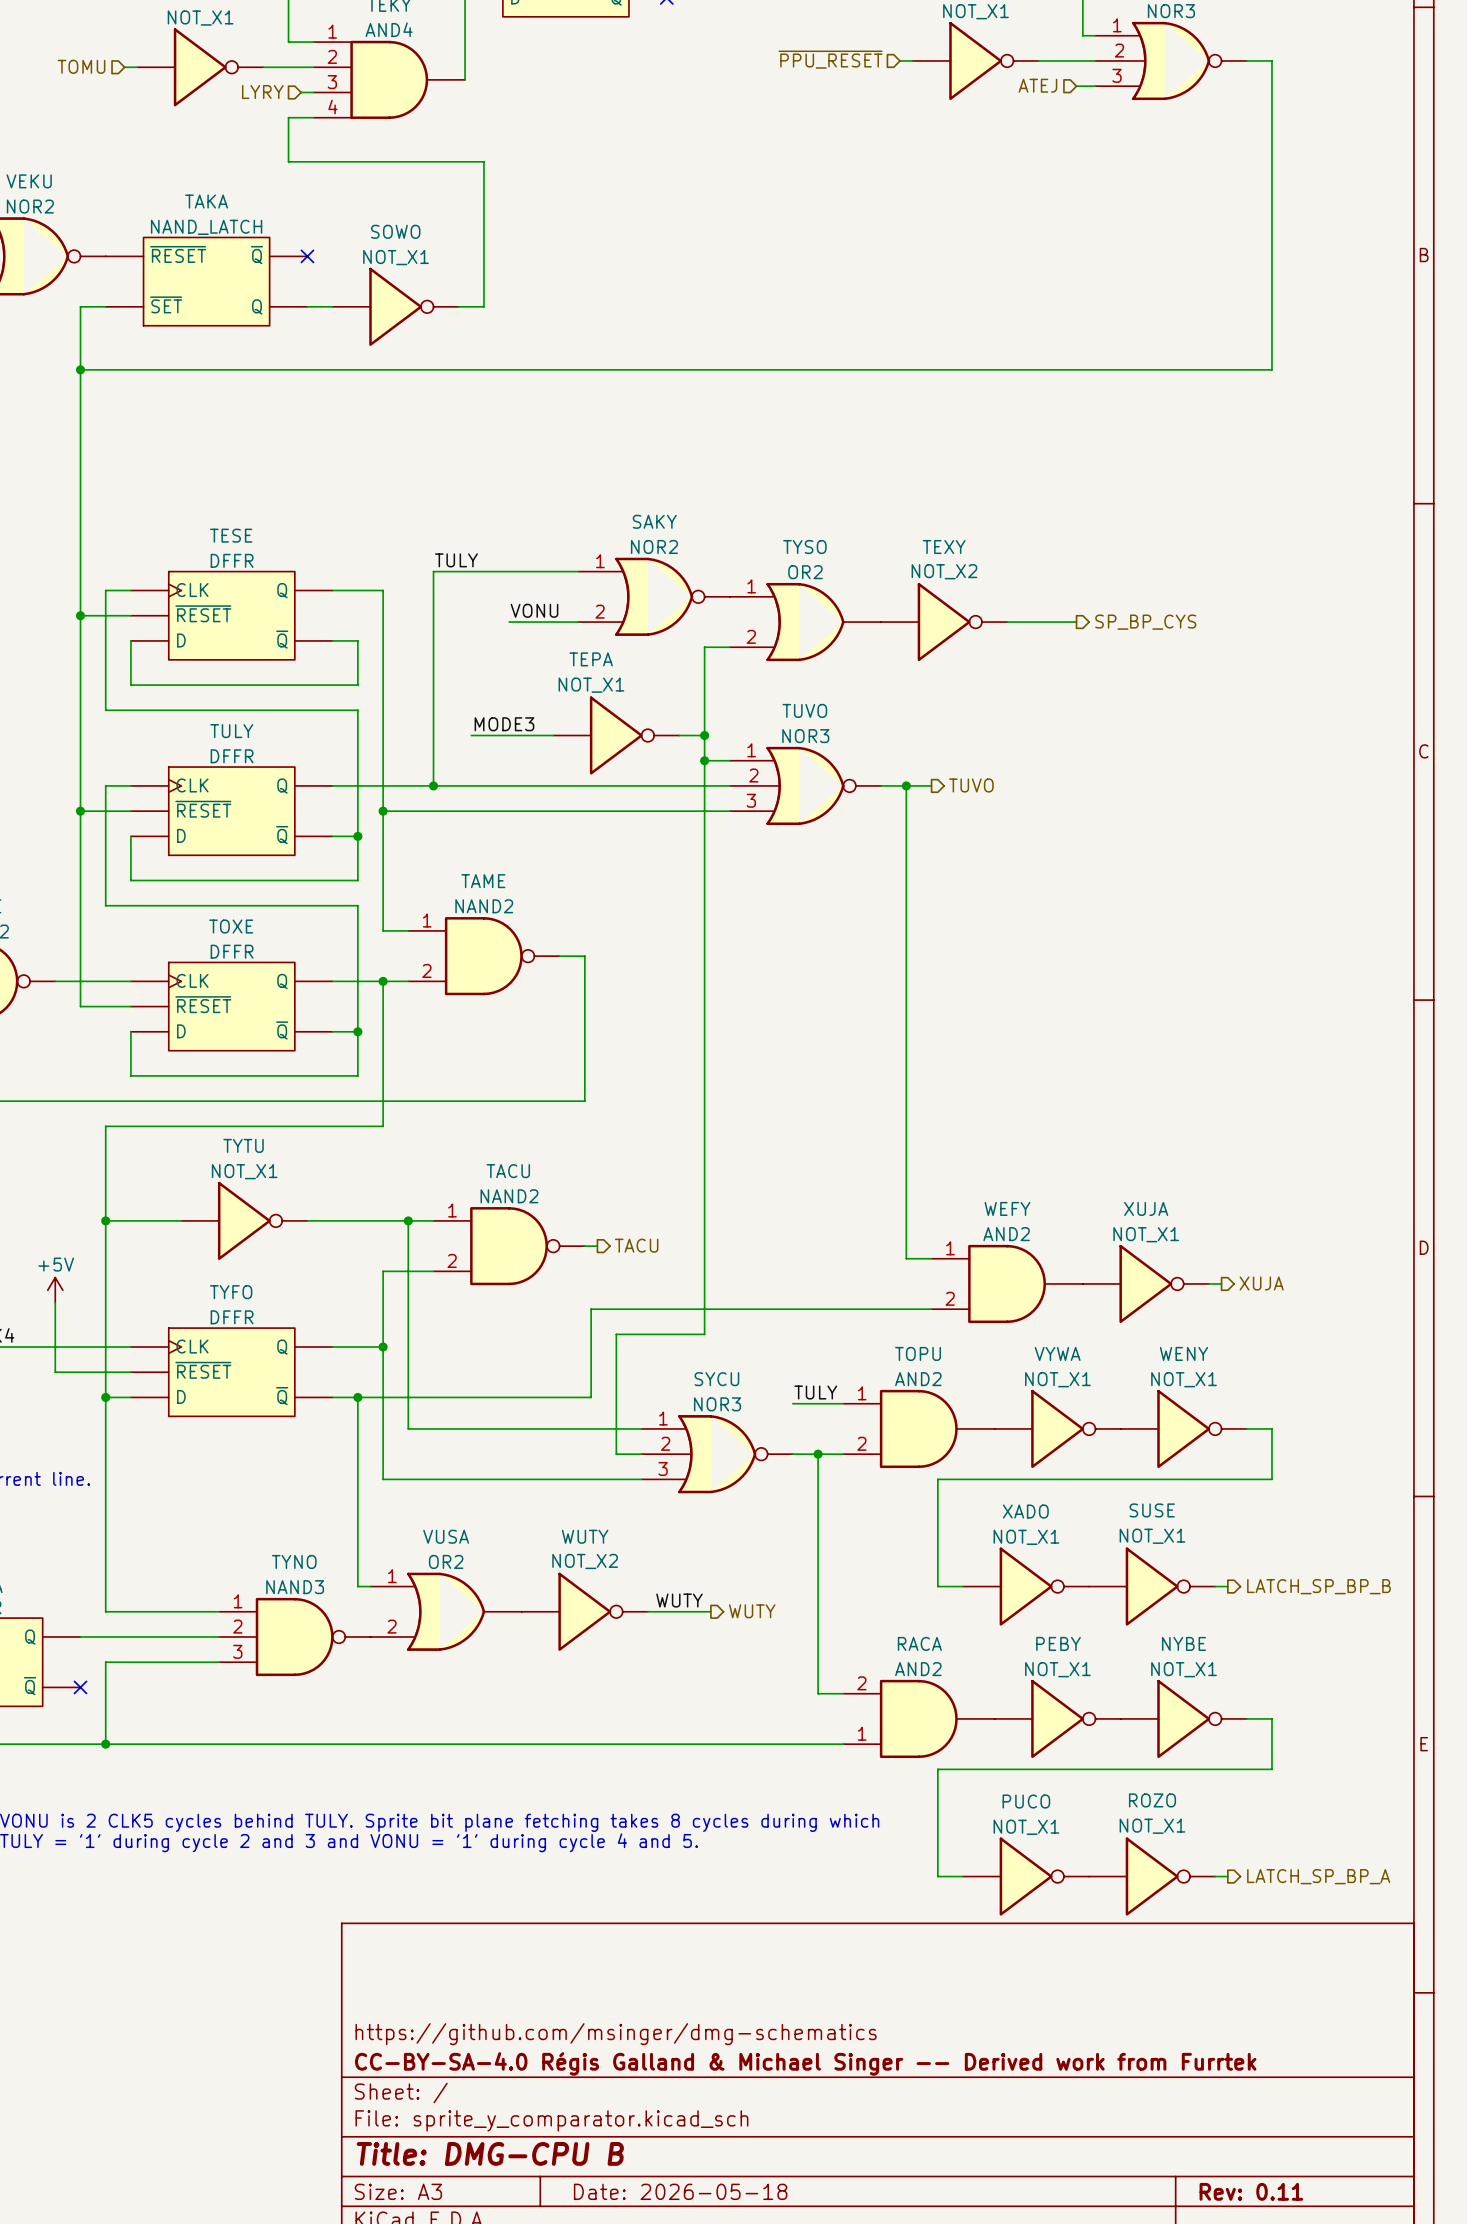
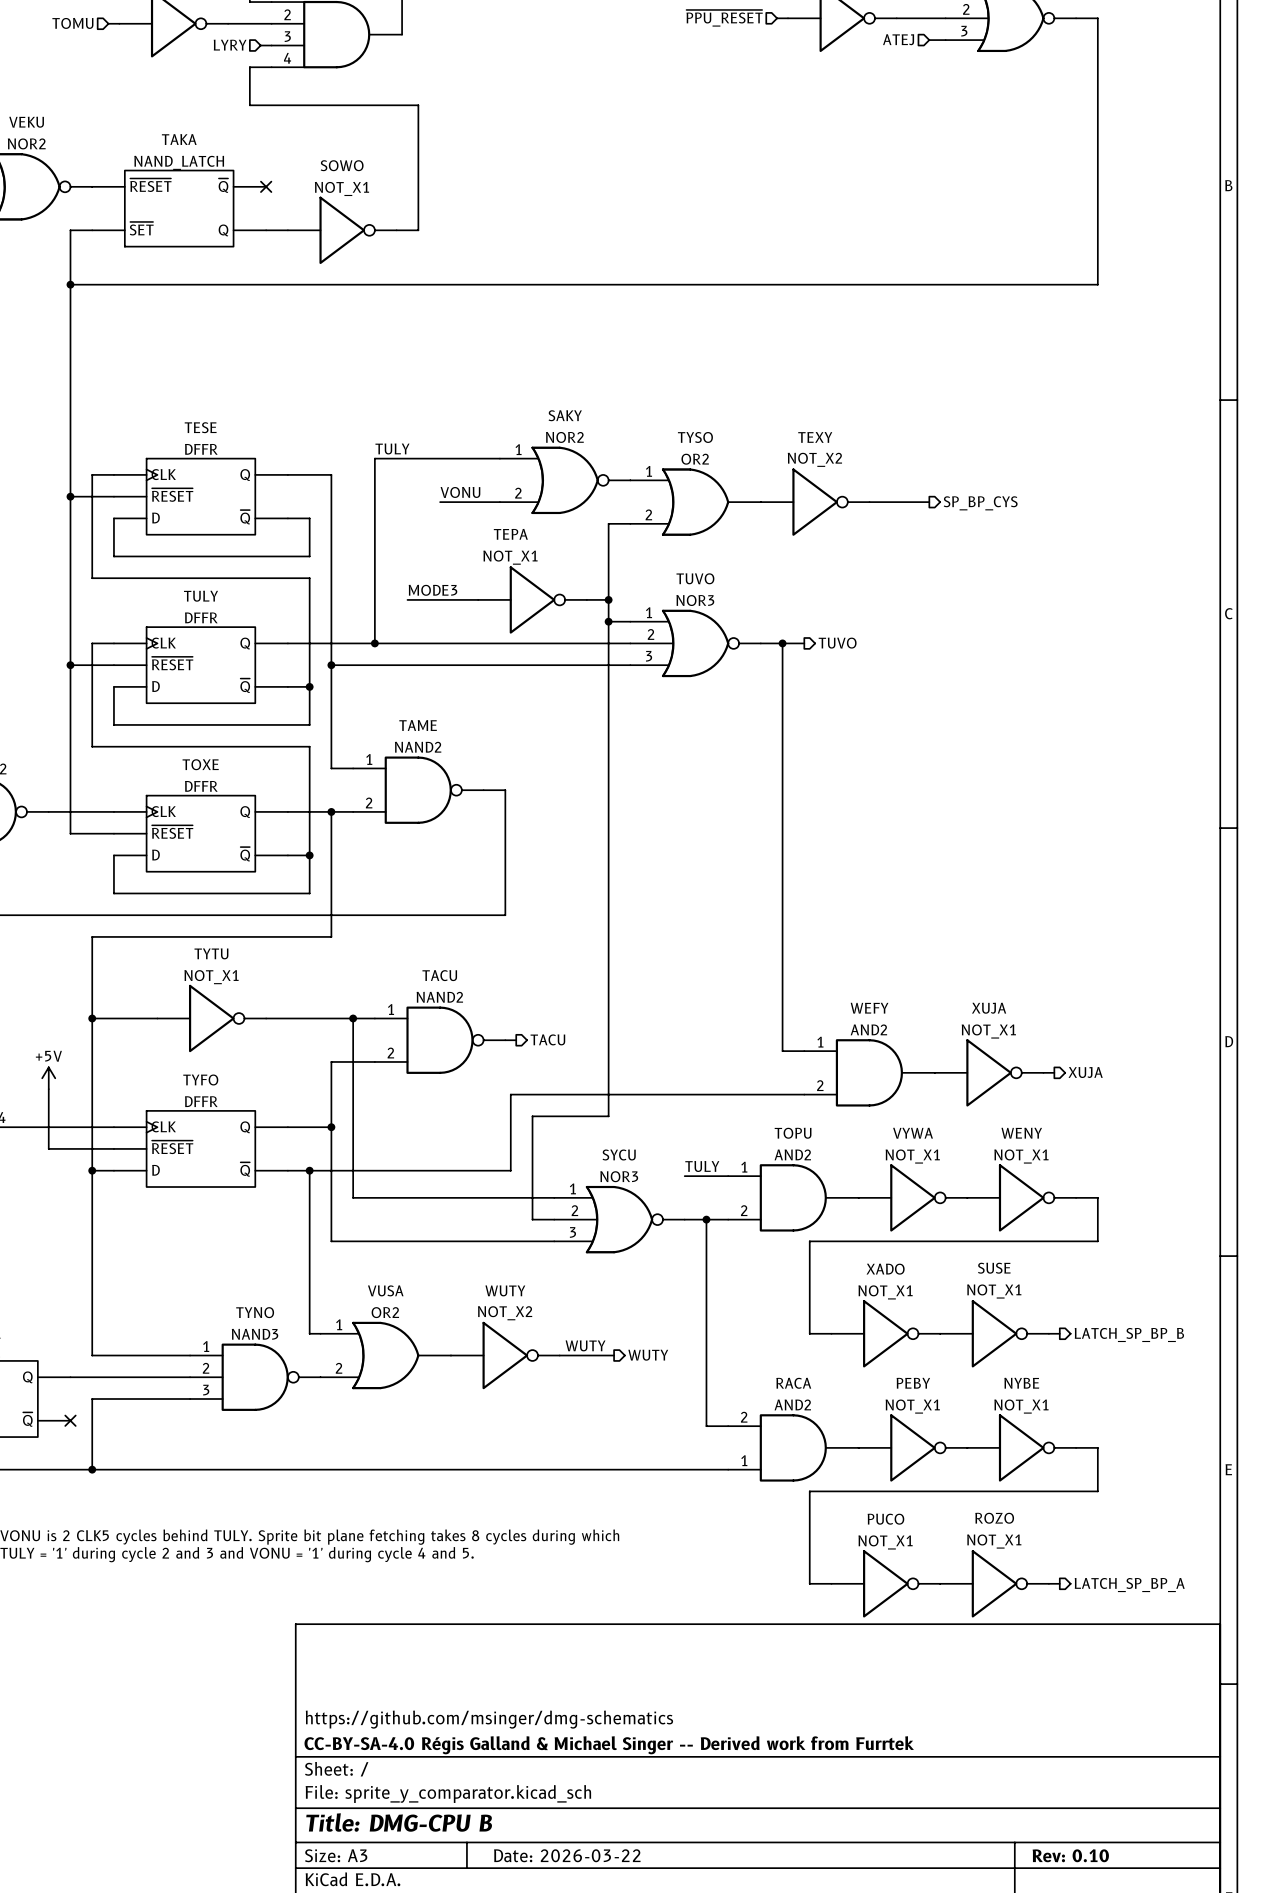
title block: Date: 2026-05-18 (680, 2191) -> Date: 2026-03-22 (567, 1855)
title block: Rev: 0.11 (1251, 2191) -> Rev: 0.10 (1070, 1855)

